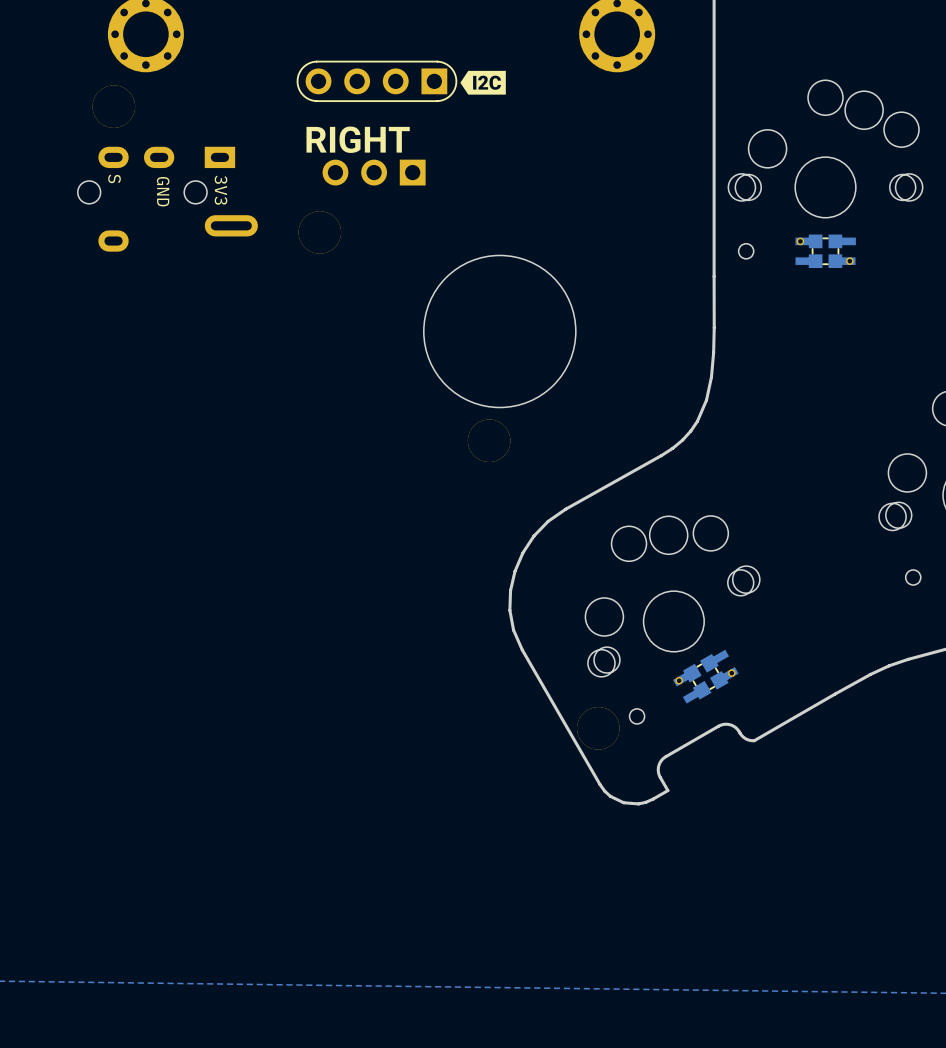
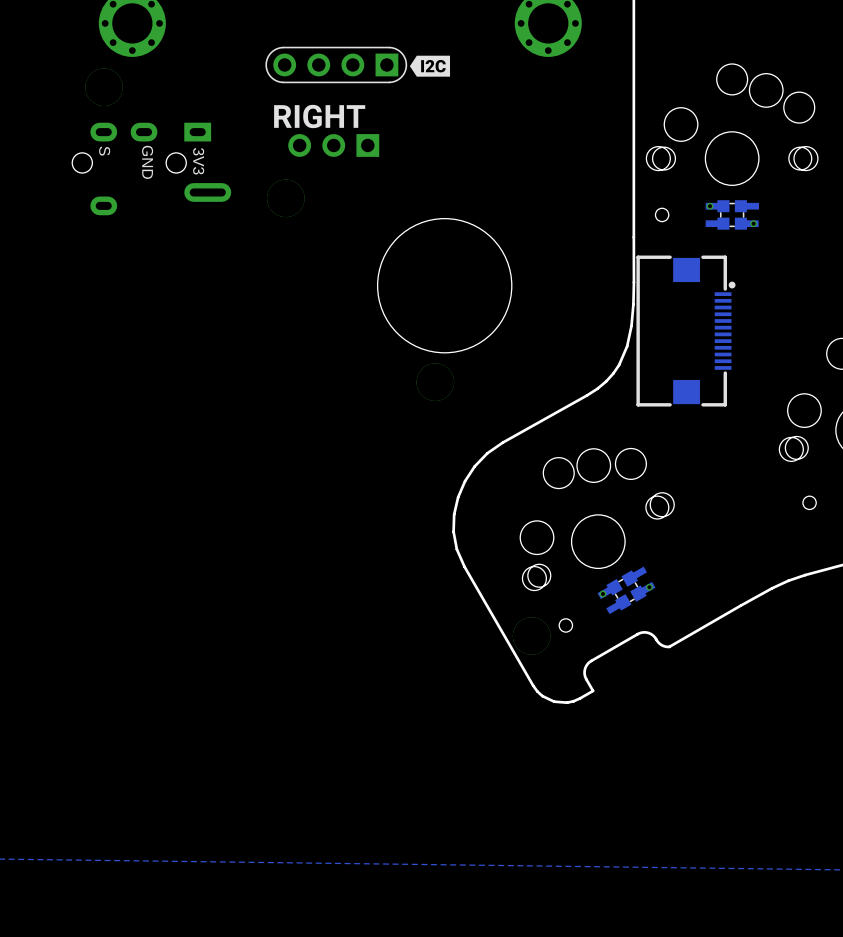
part: none -> (685, 331)

